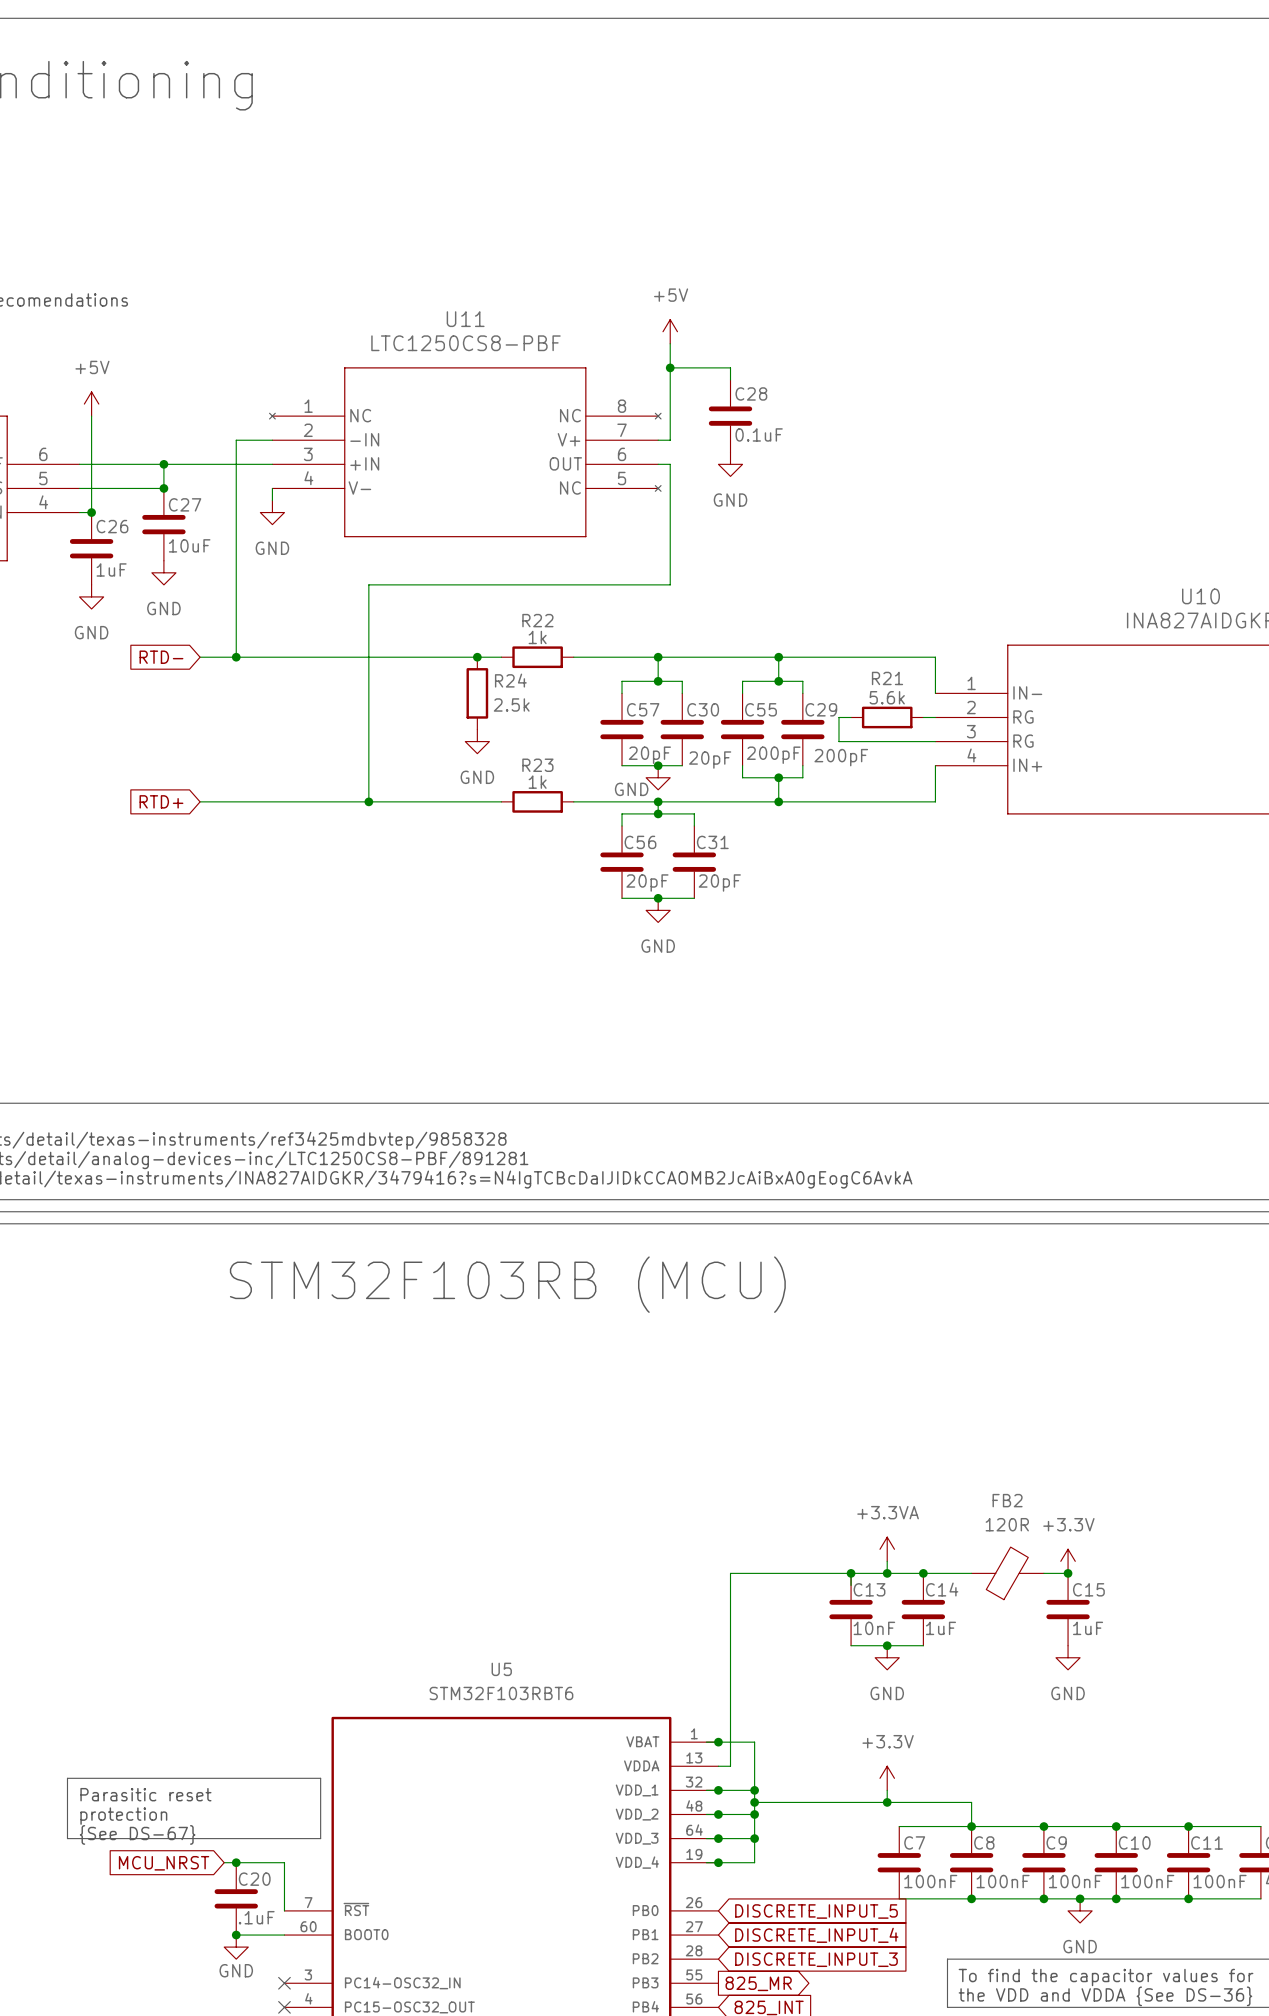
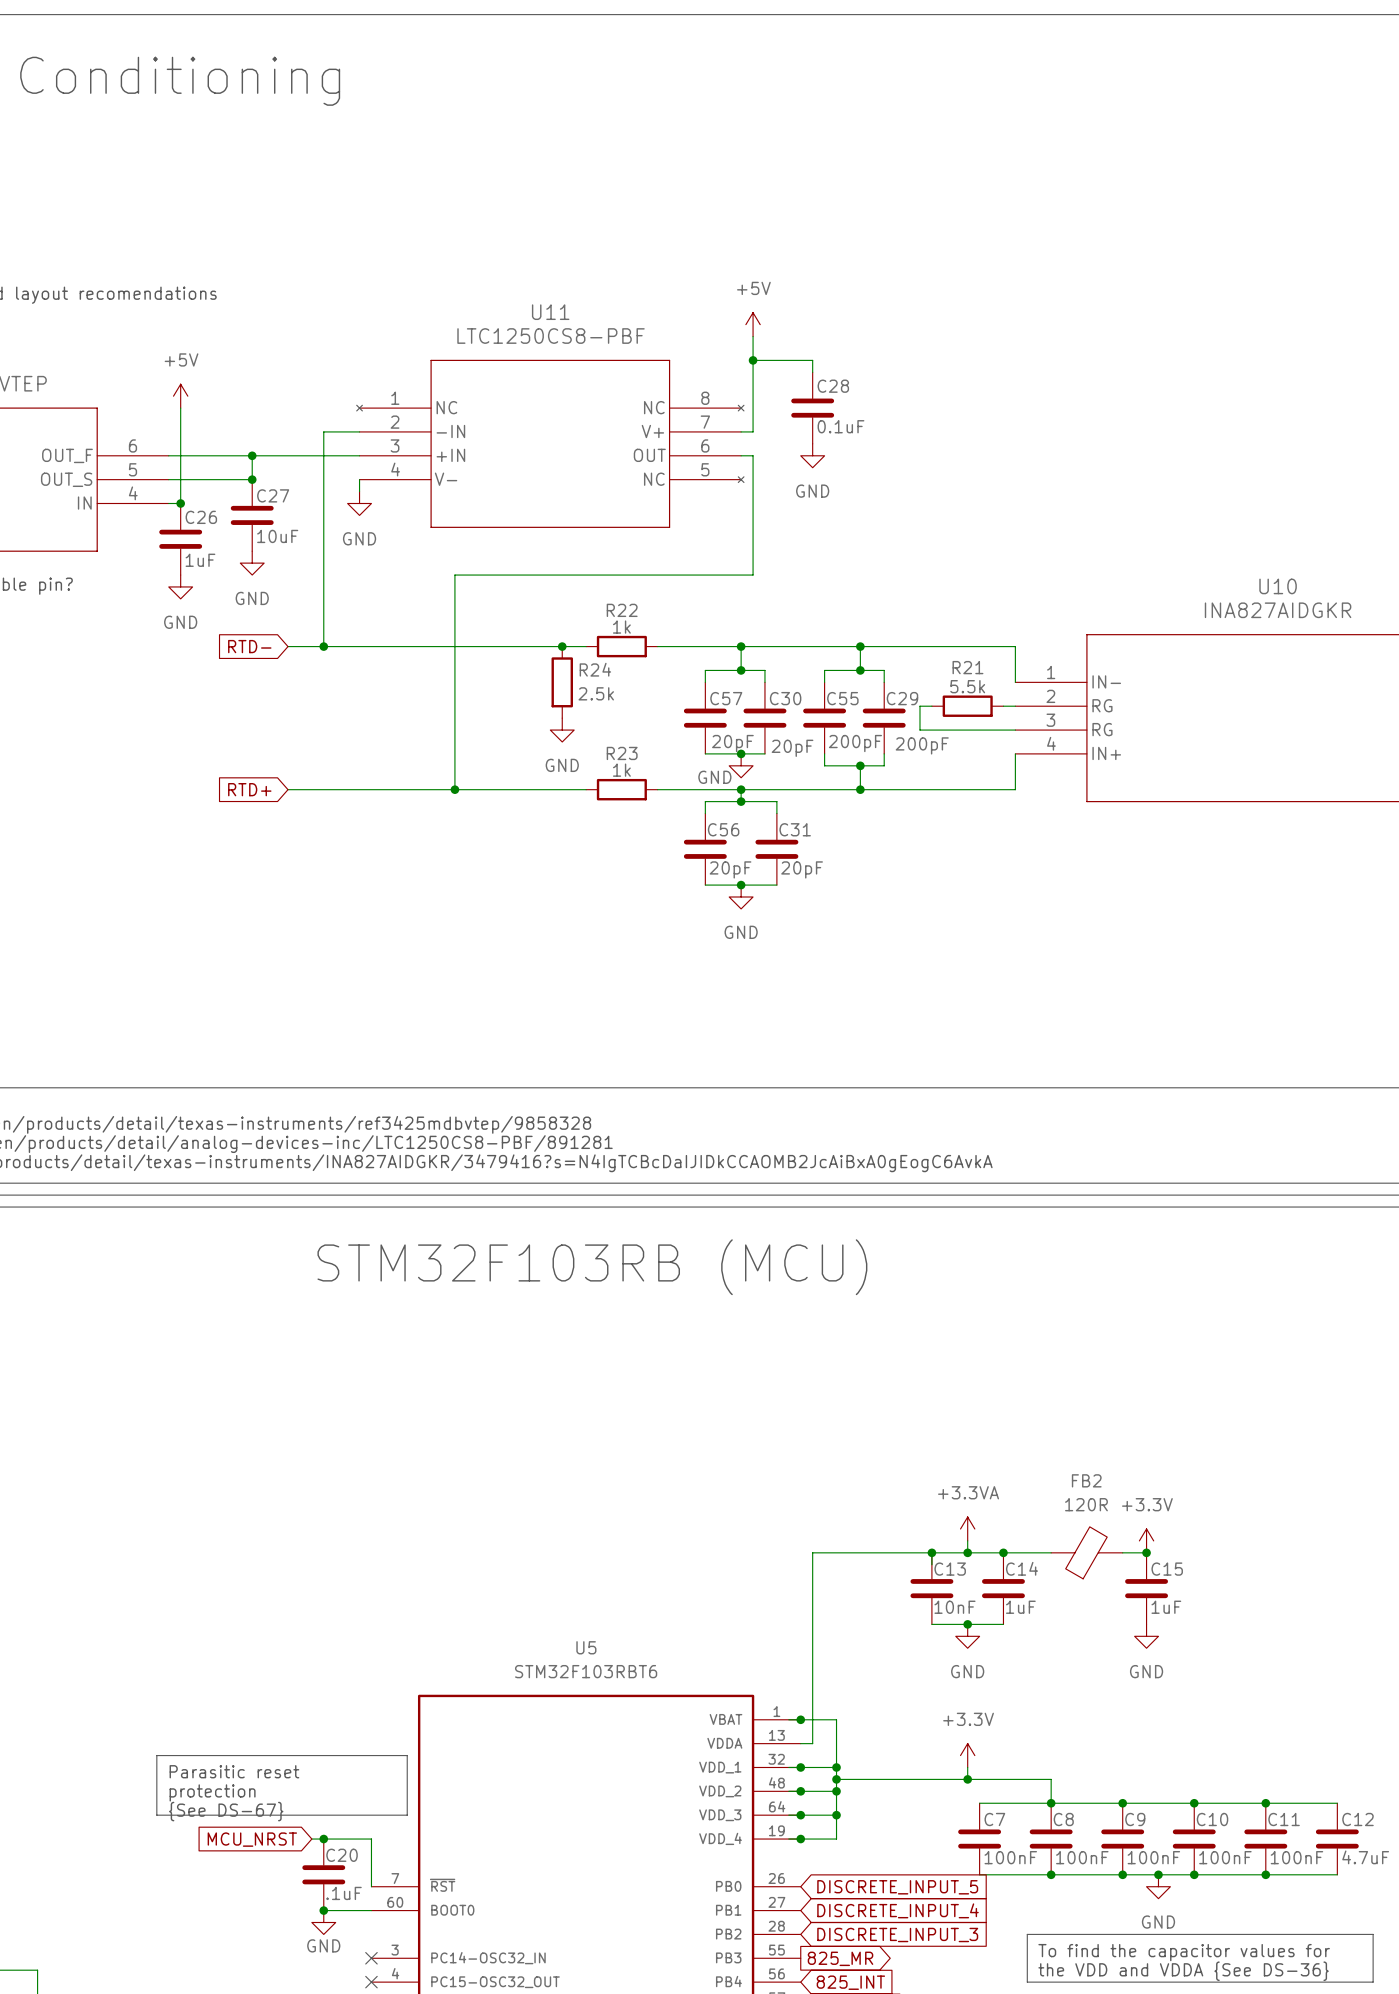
R21 value: 5.6k (887, 697) -> 5.5k (967, 686)

